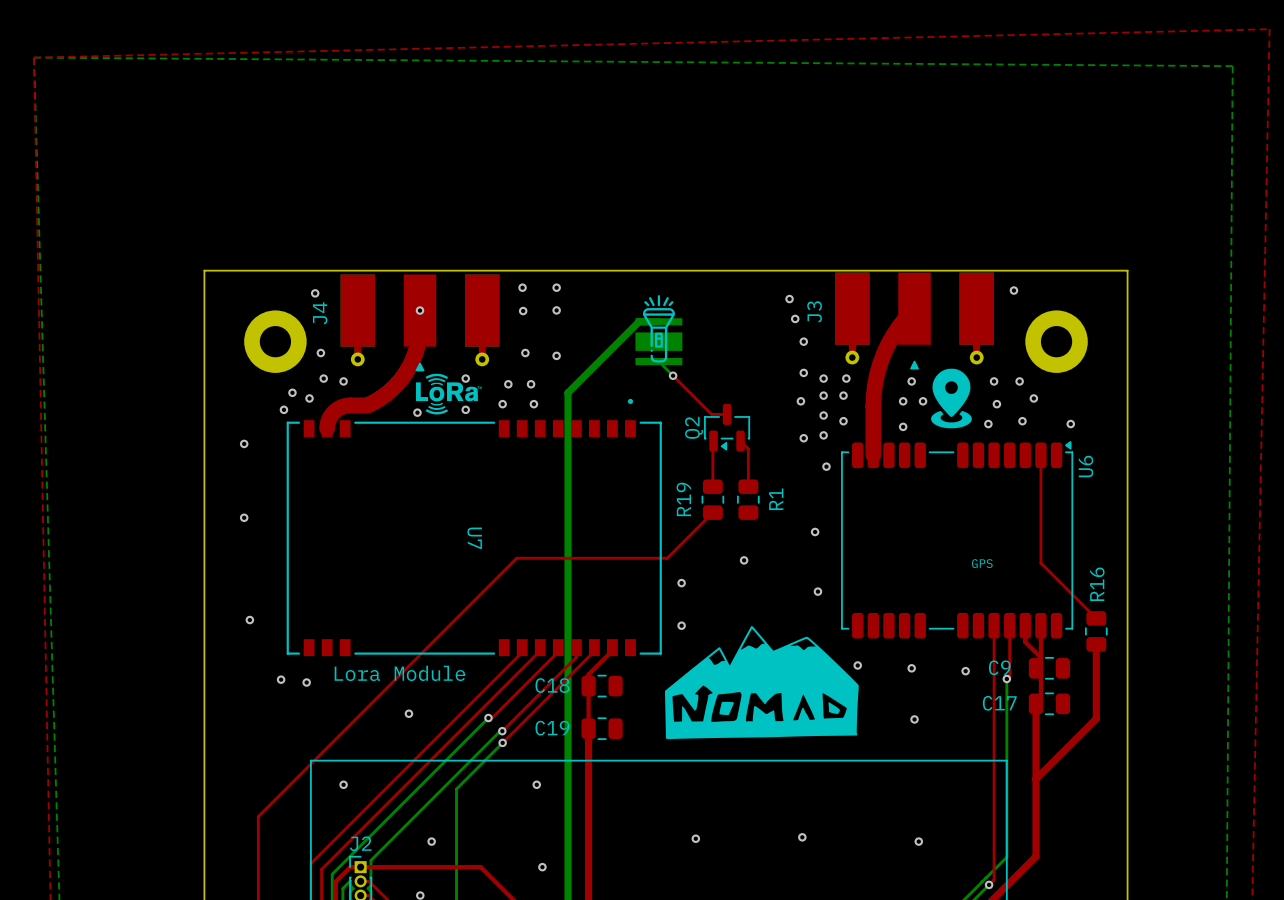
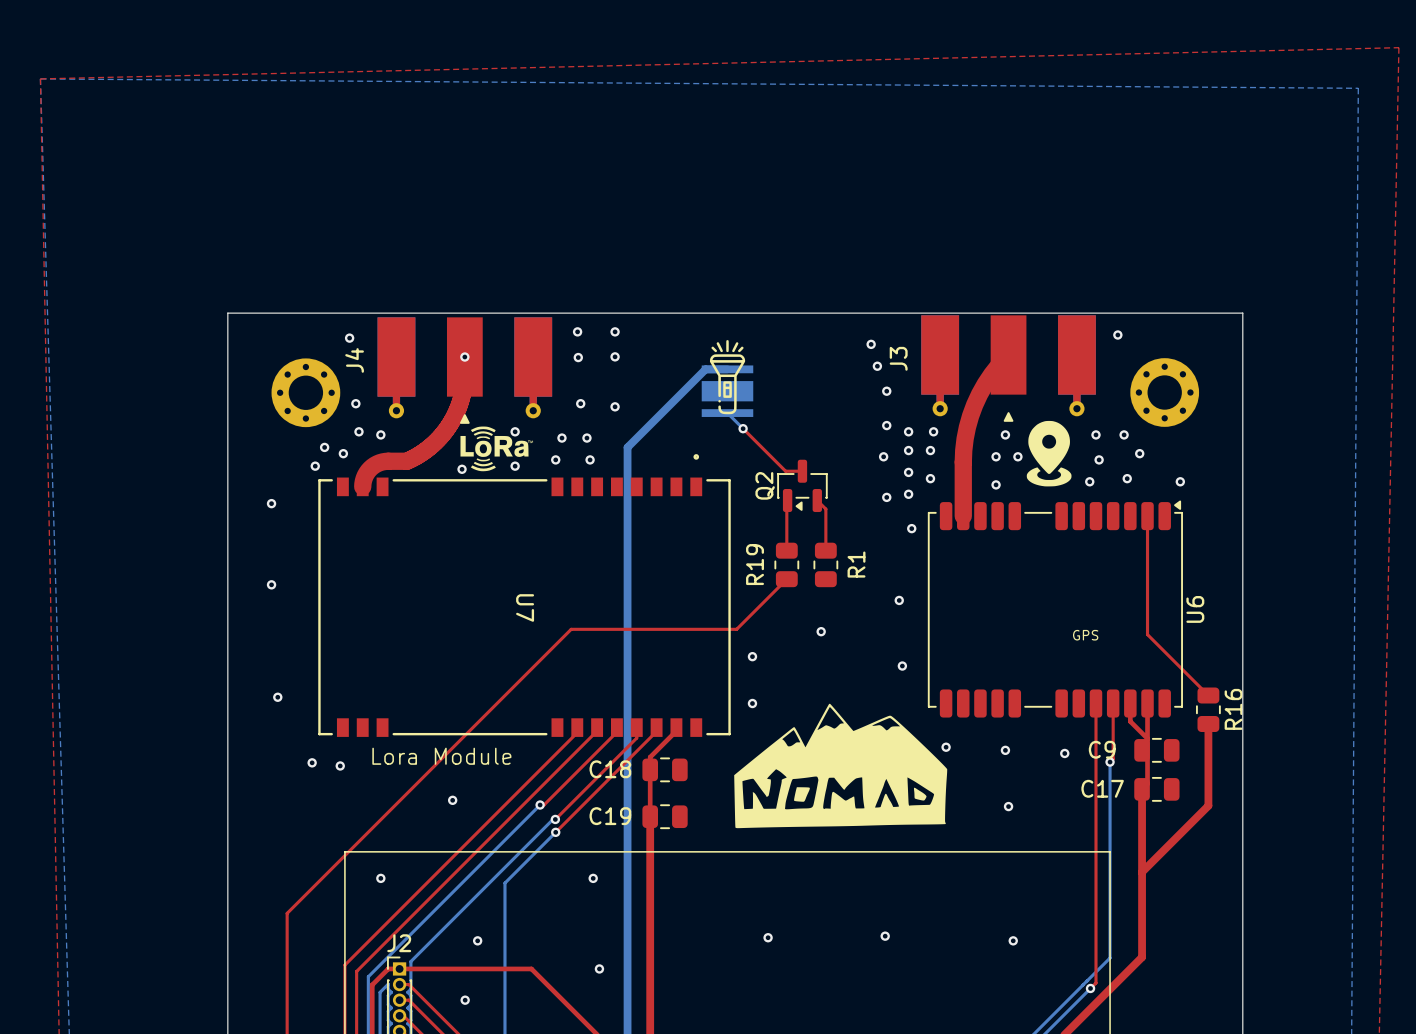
part footprint: [244, 310, 307, 373] -> [271, 358, 341, 428]
part footprint: [1025, 310, 1088, 373] -> [1130, 358, 1200, 427]
U6 name position: U6 (1085, 466) -> U6 (1195, 609)
R16 name position: R16 (1097, 584) -> R16 (1233, 709)

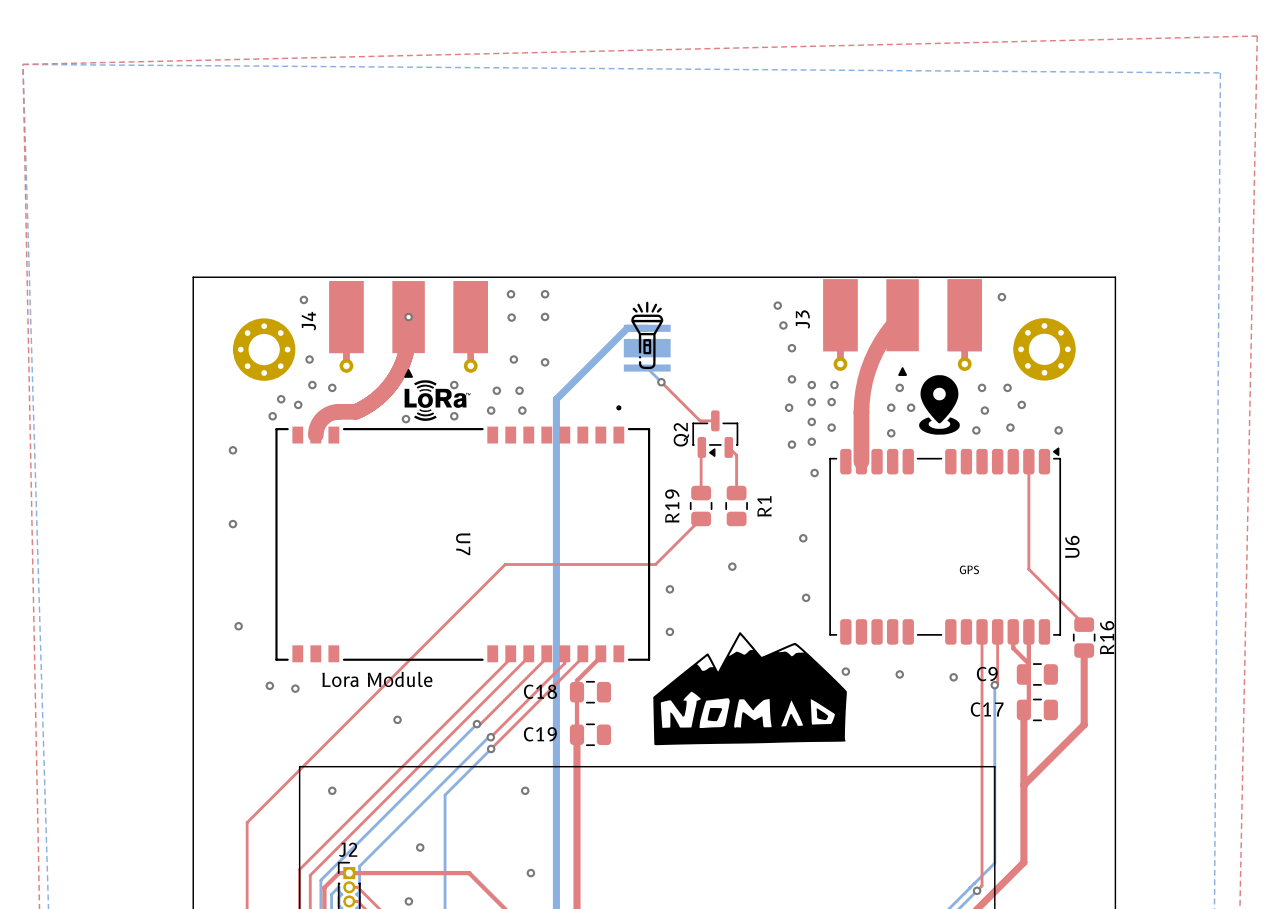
via: (1008, 806) -> none
via: (885, 936) -> none
via: (768, 937) -> none
via: (1013, 940) -> none

